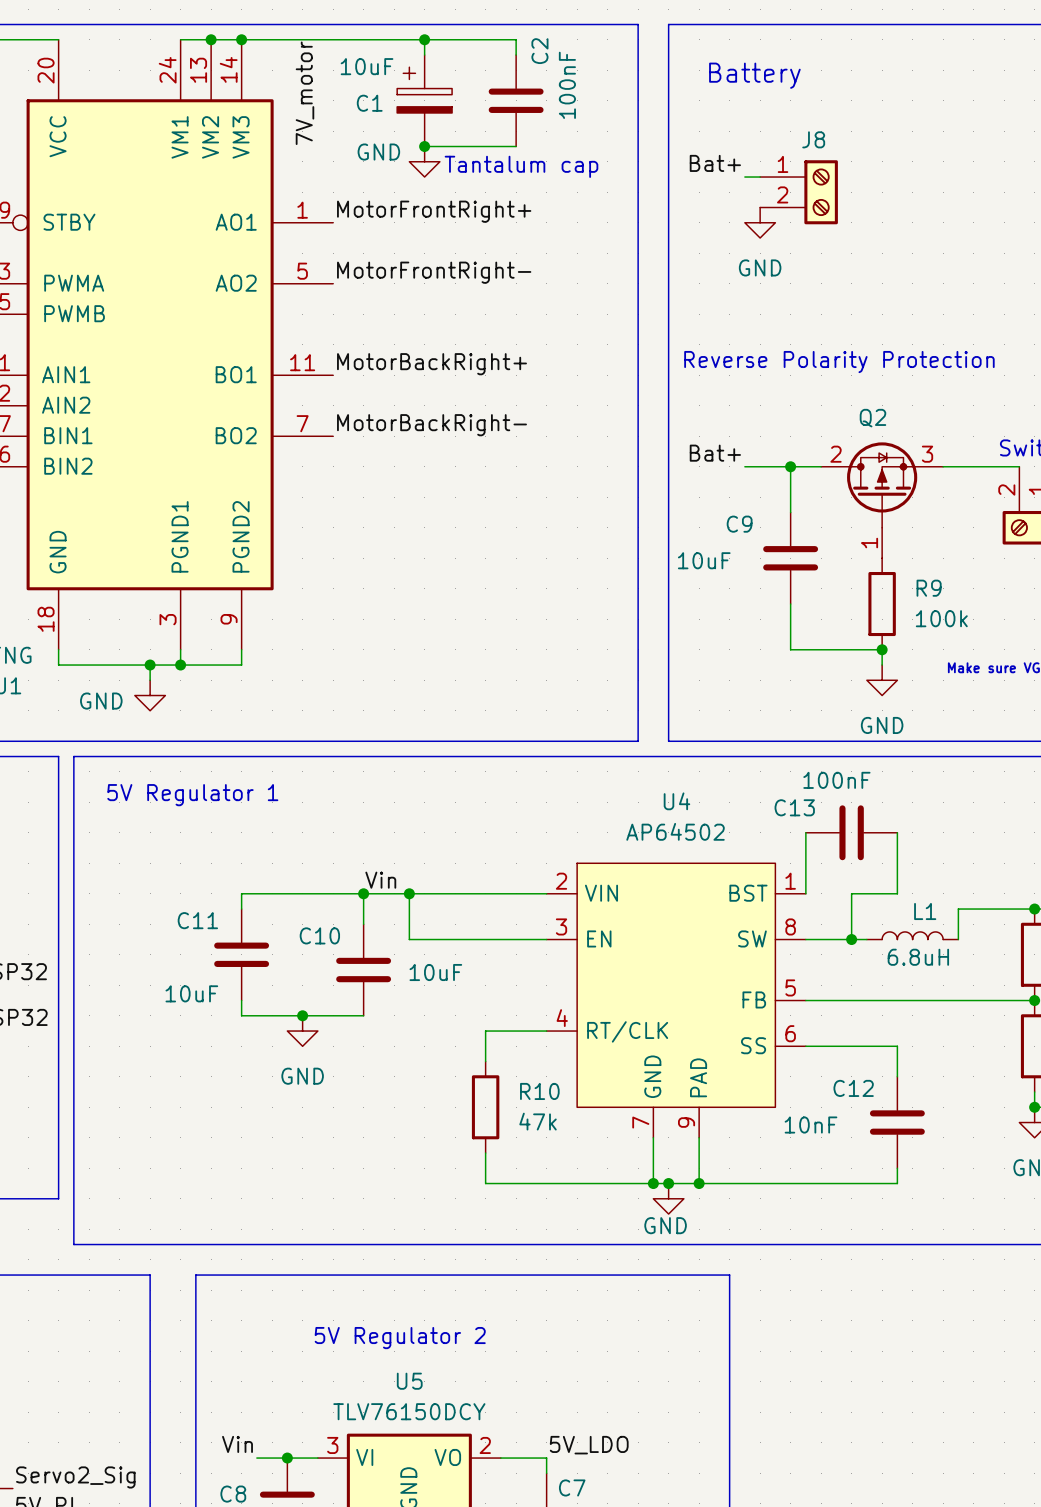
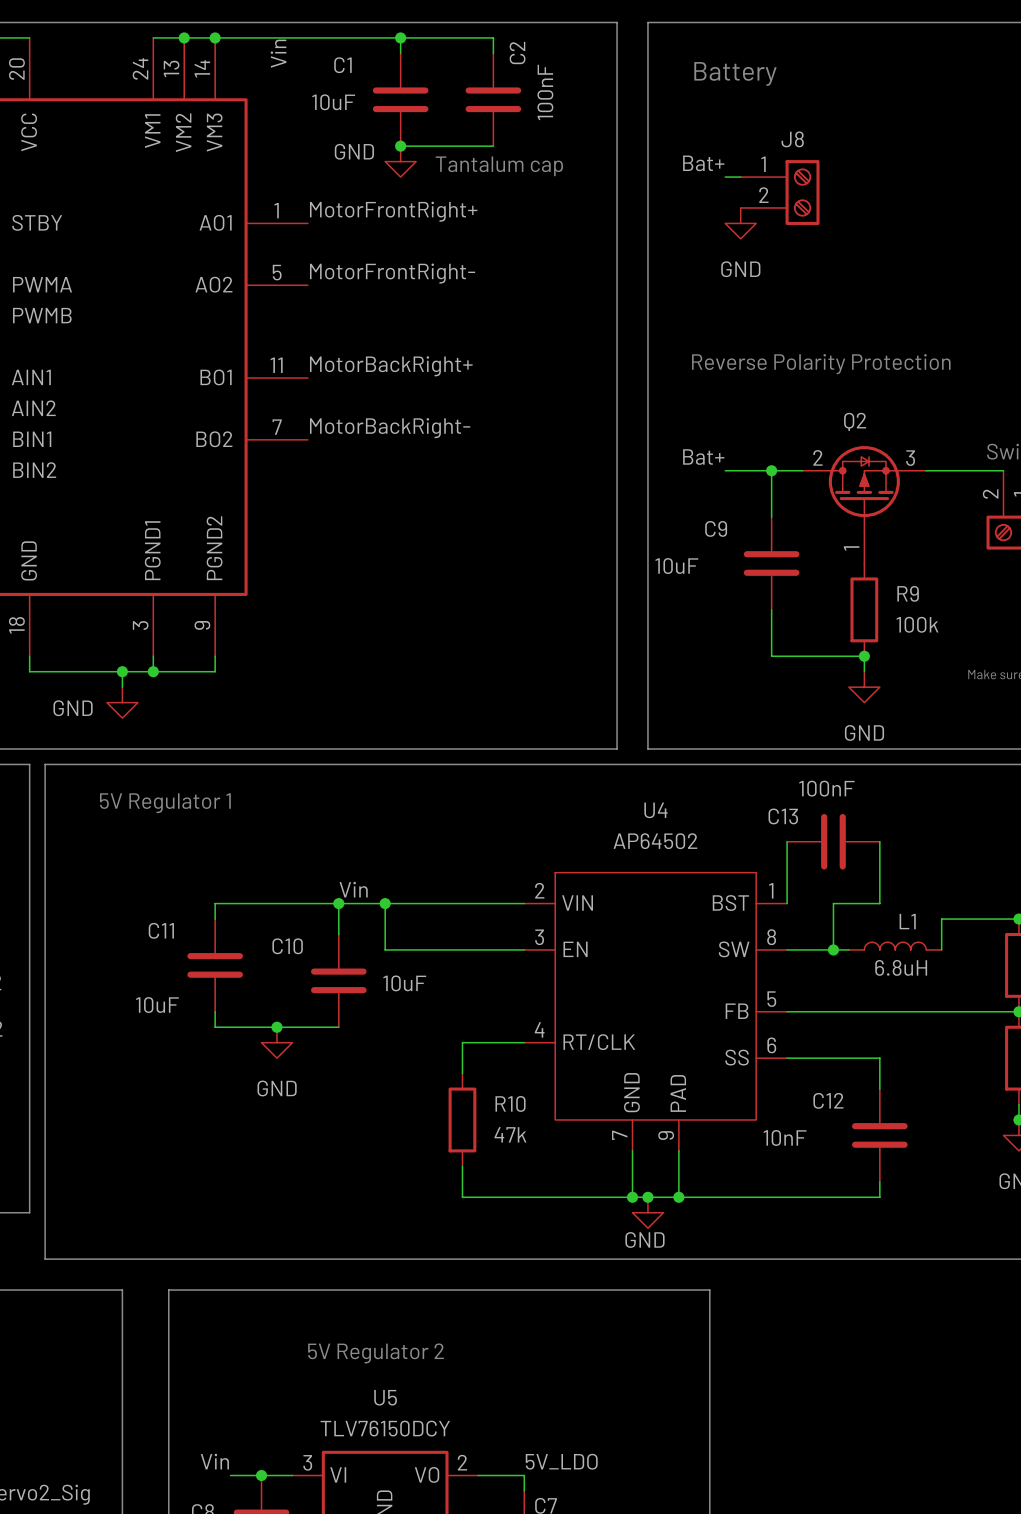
C1 symbol: [397, 55, 453, 147] -> [372, 53, 429, 147]
C1 value position: 10uF (367, 66) -> 10uF (333, 102)
label: 7V_motor (304, 93) -> Vin (278, 53)
C1 name position: C1 (369, 103) -> C1 (342, 65)

